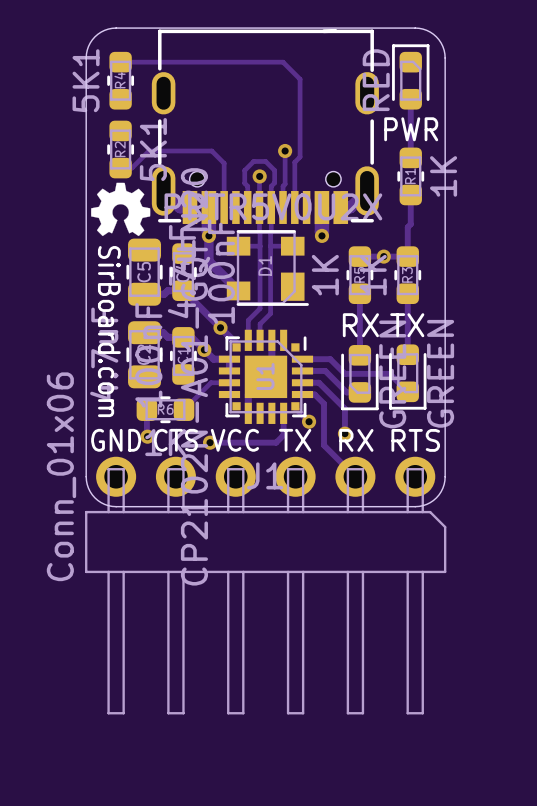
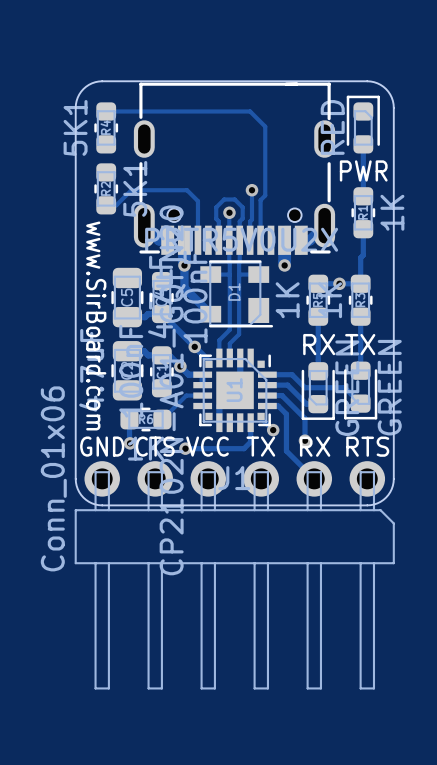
drawing: [91, 182, 151, 237] -> none
text: SirBoard.com (109, 331) -> www.SirBoard.com (96, 325)

